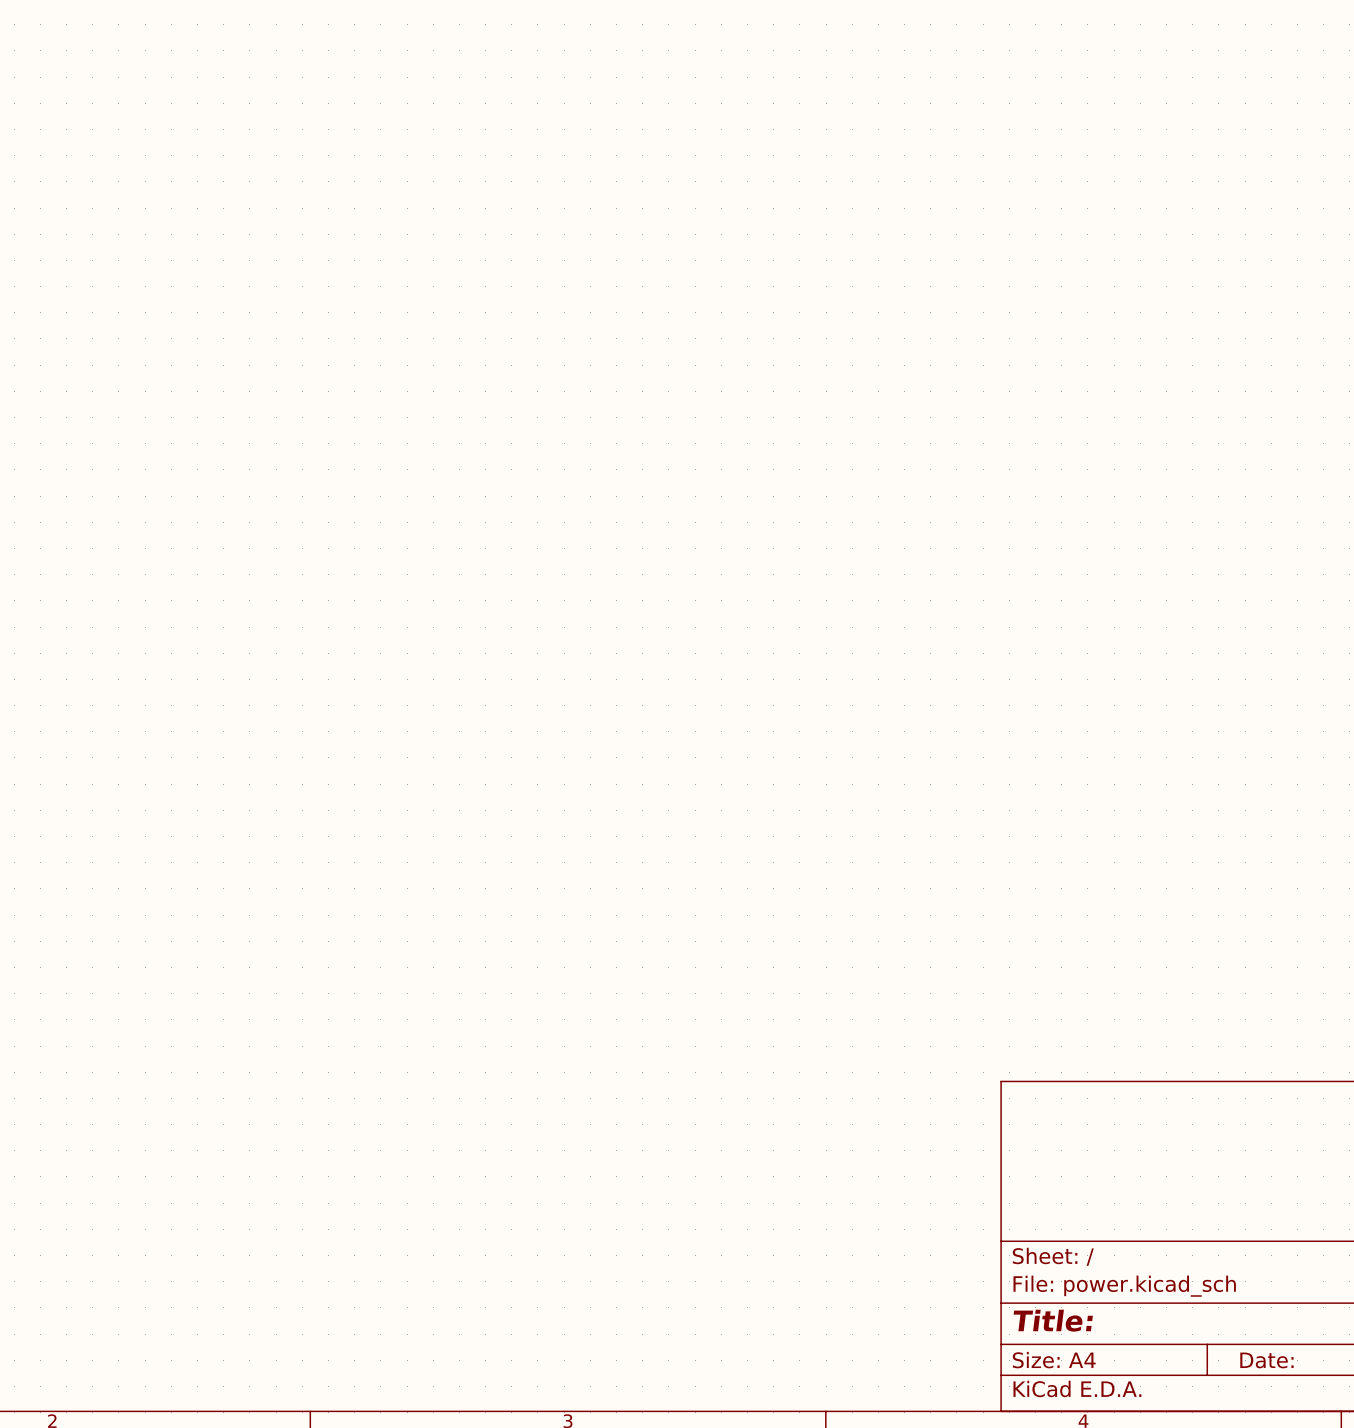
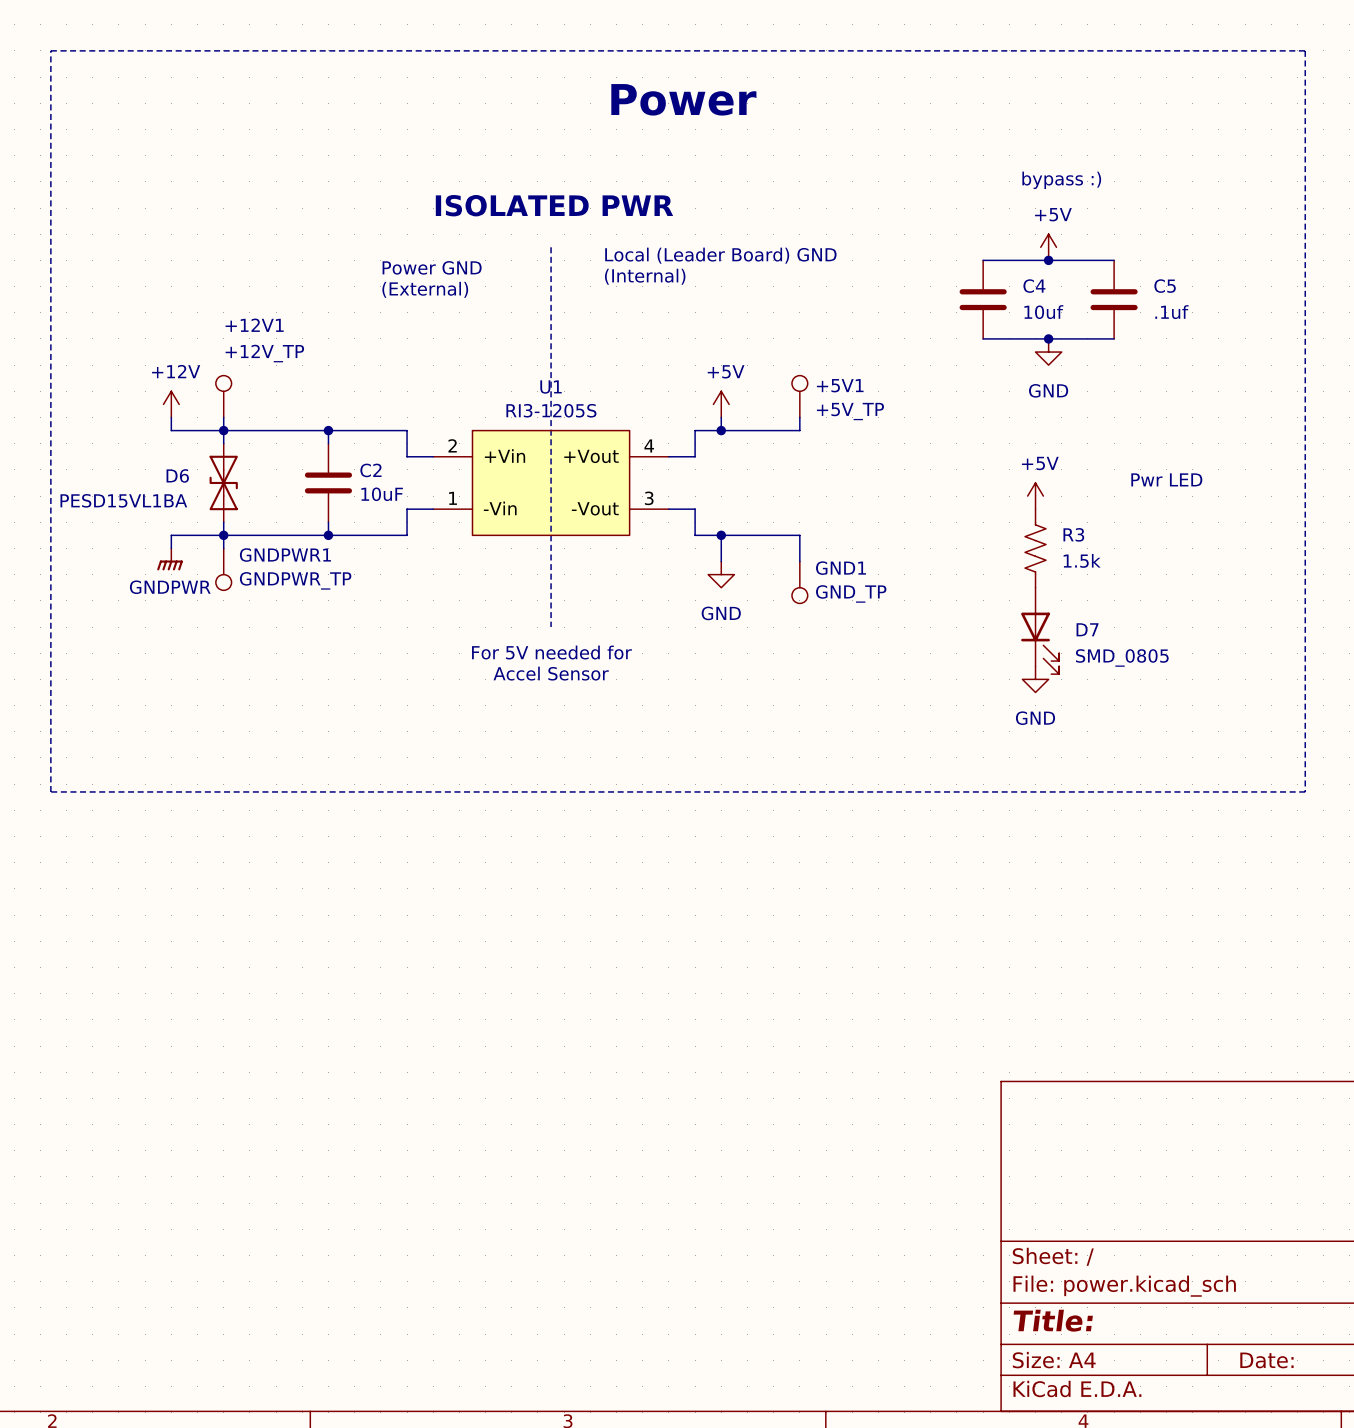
line: none -> (50, 50) (1305, 50) (1305, 791) (50, 791) (50, 50)
text: none -> Power (683, 99)
text: none -> bypass :) (1061, 180)
text: none -> ISOLATED PWR (554, 205)
line: none -> (551, 247) (551, 627)
power symbol: none -> +5V (1048, 247)
text: none -> Local (Leader Board) GND (720, 255)
wire: none -> (983, 260) (1114, 260)
junction: none -> (1048, 260)
text: none -> Power GND (432, 267)
text: none -> (Internal) (645, 276)
text: none -> (External) (425, 289)
C4: none -> 10uf (983, 299)
C5: none -> .1uf (1114, 299)
wire: none -> (983, 338) (1114, 338)
junction: none -> (1048, 338)
power symbol: none -> GND (1048, 352)
+12V1: none -> +12V_TP (223, 396)
+5V1: none -> +5V_TP (799, 396)
power symbol: none -> +12V (171, 404)
power symbol: none -> +5V (721, 404)
wire: none -> (171, 417) (171, 430) (407, 430) (407, 456) (433, 456)
wire: none -> (223, 417) (223, 443)
wire: none -> (721, 417) (721, 430)
wire: none -> (799, 417) (799, 430) (695, 430) (695, 456) (668, 456)
junction: none -> (223, 430)
wire: none -> (328, 430) (328, 443)
junction: none -> (328, 430)
junction: none -> (721, 430)
text: none -> Pwr LED (1166, 479)
D6: none -> PESD15VL1BA (223, 482)
C2: none -> 10uF (328, 482)
U1: none -> RI3-1205S (551, 482)
power symbol: none -> +5V (1035, 496)
wire: none -> (433, 509) (407, 509) (407, 535) (171, 535) (171, 548)
wire: none -> (668, 509) (695, 509) (695, 535) (799, 535) (799, 561)
wire: none -> (223, 522) (223, 548)
wire: none -> (328, 522) (328, 535)
junction: none -> (223, 535)
junction: none -> (328, 535)
wire: none -> (721, 535) (721, 561)
junction: none -> (721, 535)
R3: none -> 1.5k (1035, 548)
power symbol: none -> GNDPWR (170, 559)
GNDPWR1: none -> GNDPWR_TP (223, 569)
power symbol: none -> GND (721, 574)
GND1: none -> GND_TP (799, 582)
D7: none -> SMD_0805 (1040, 630)
text: none -> For 5V needed for (551, 652)
text: none -> Accel Sensor (551, 673)
power symbol: none -> GND (1035, 679)

